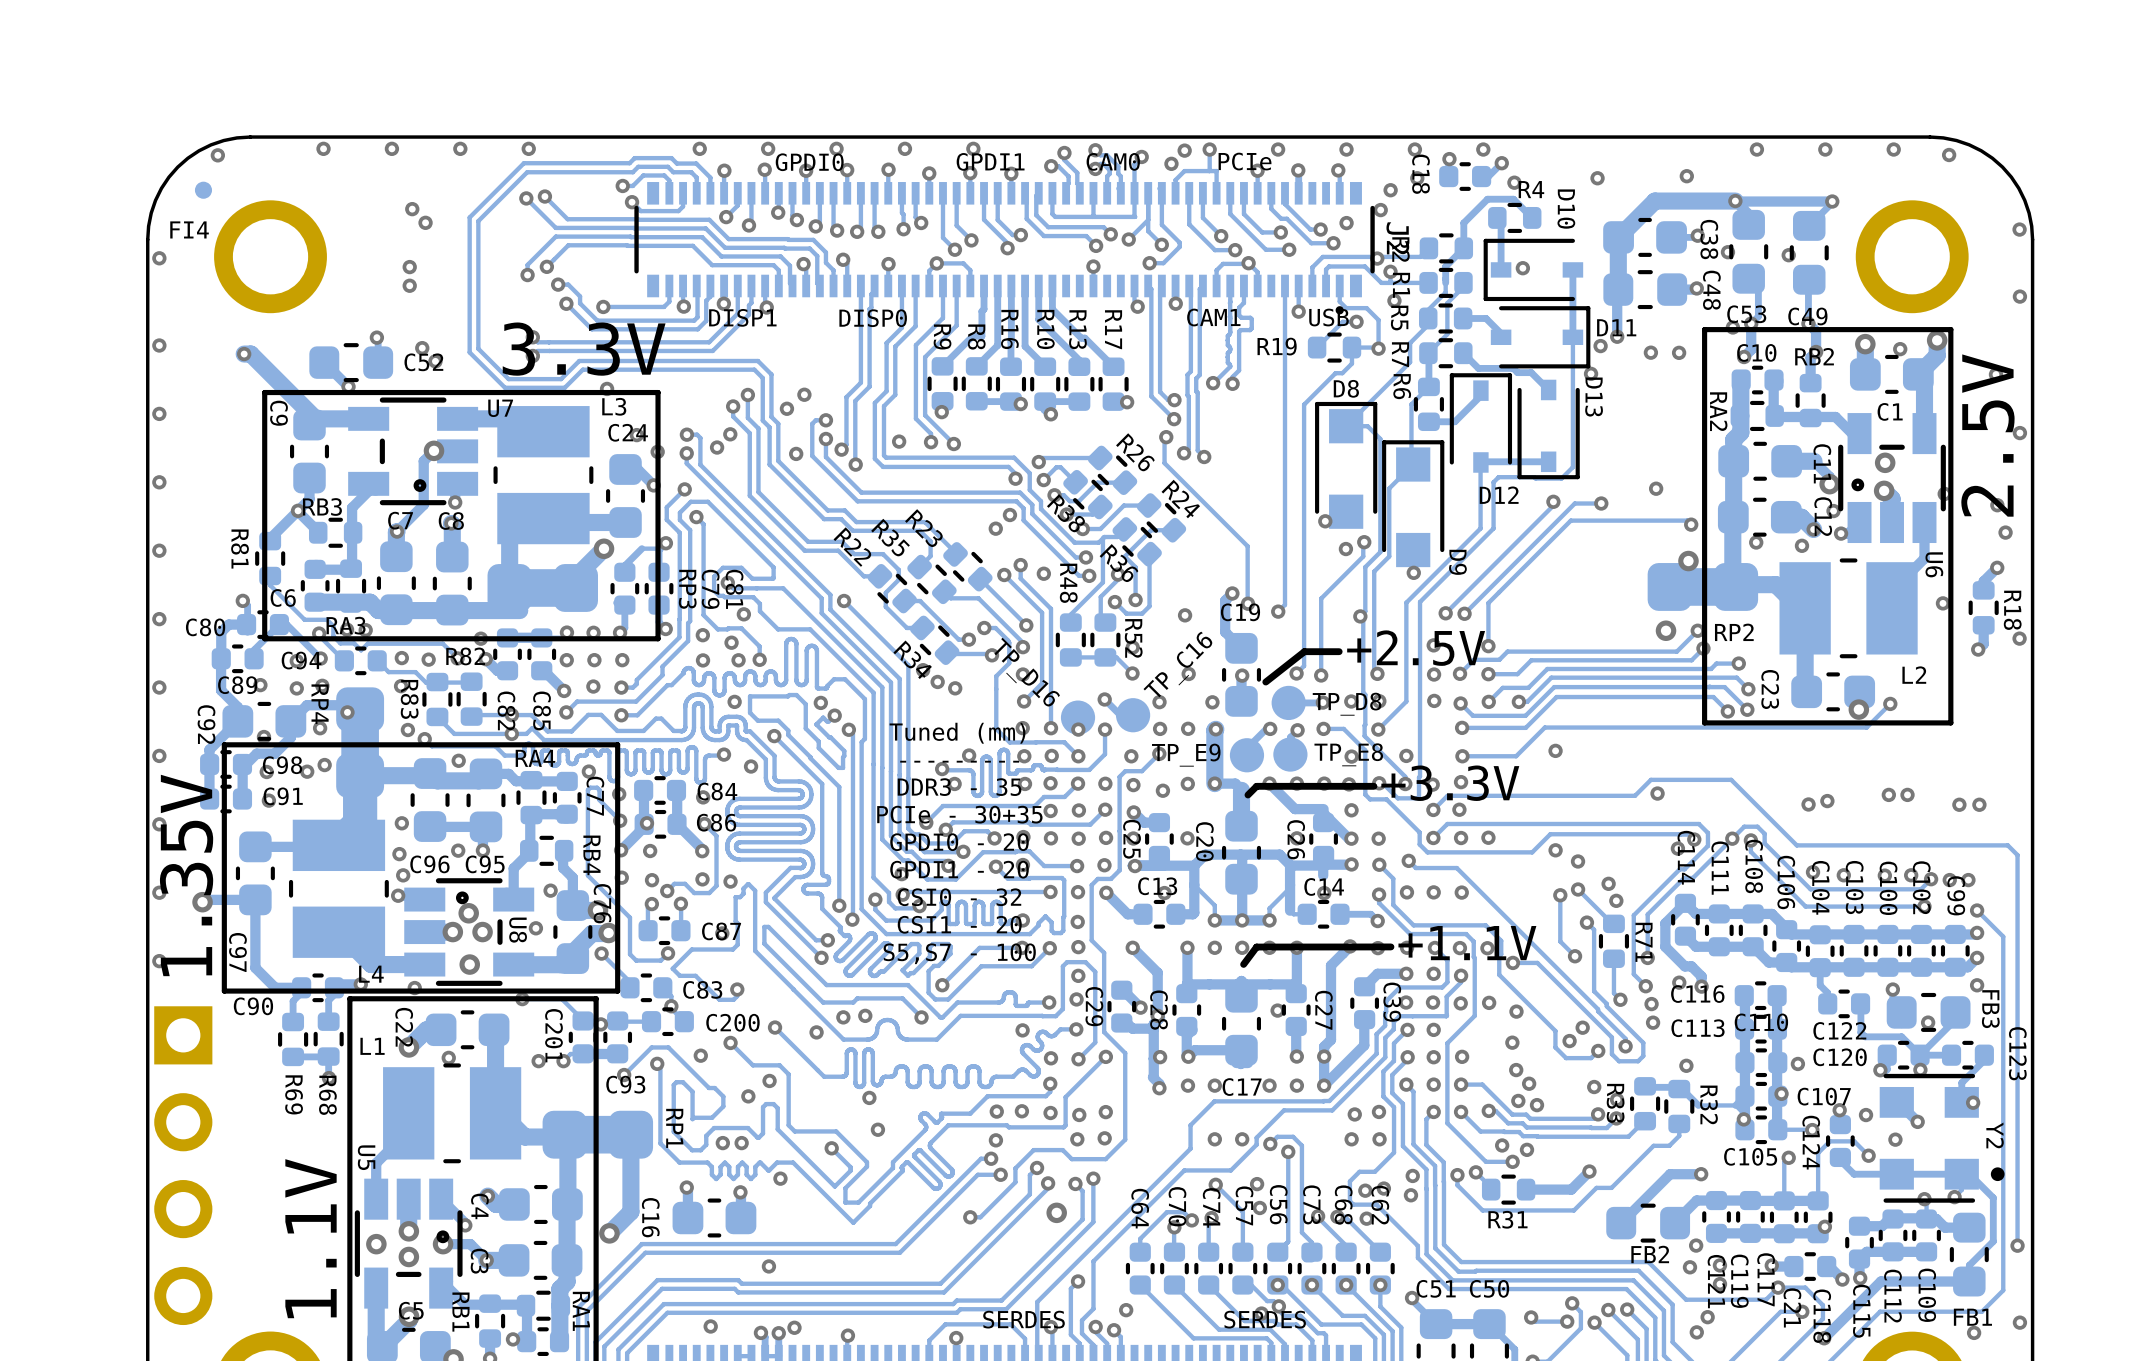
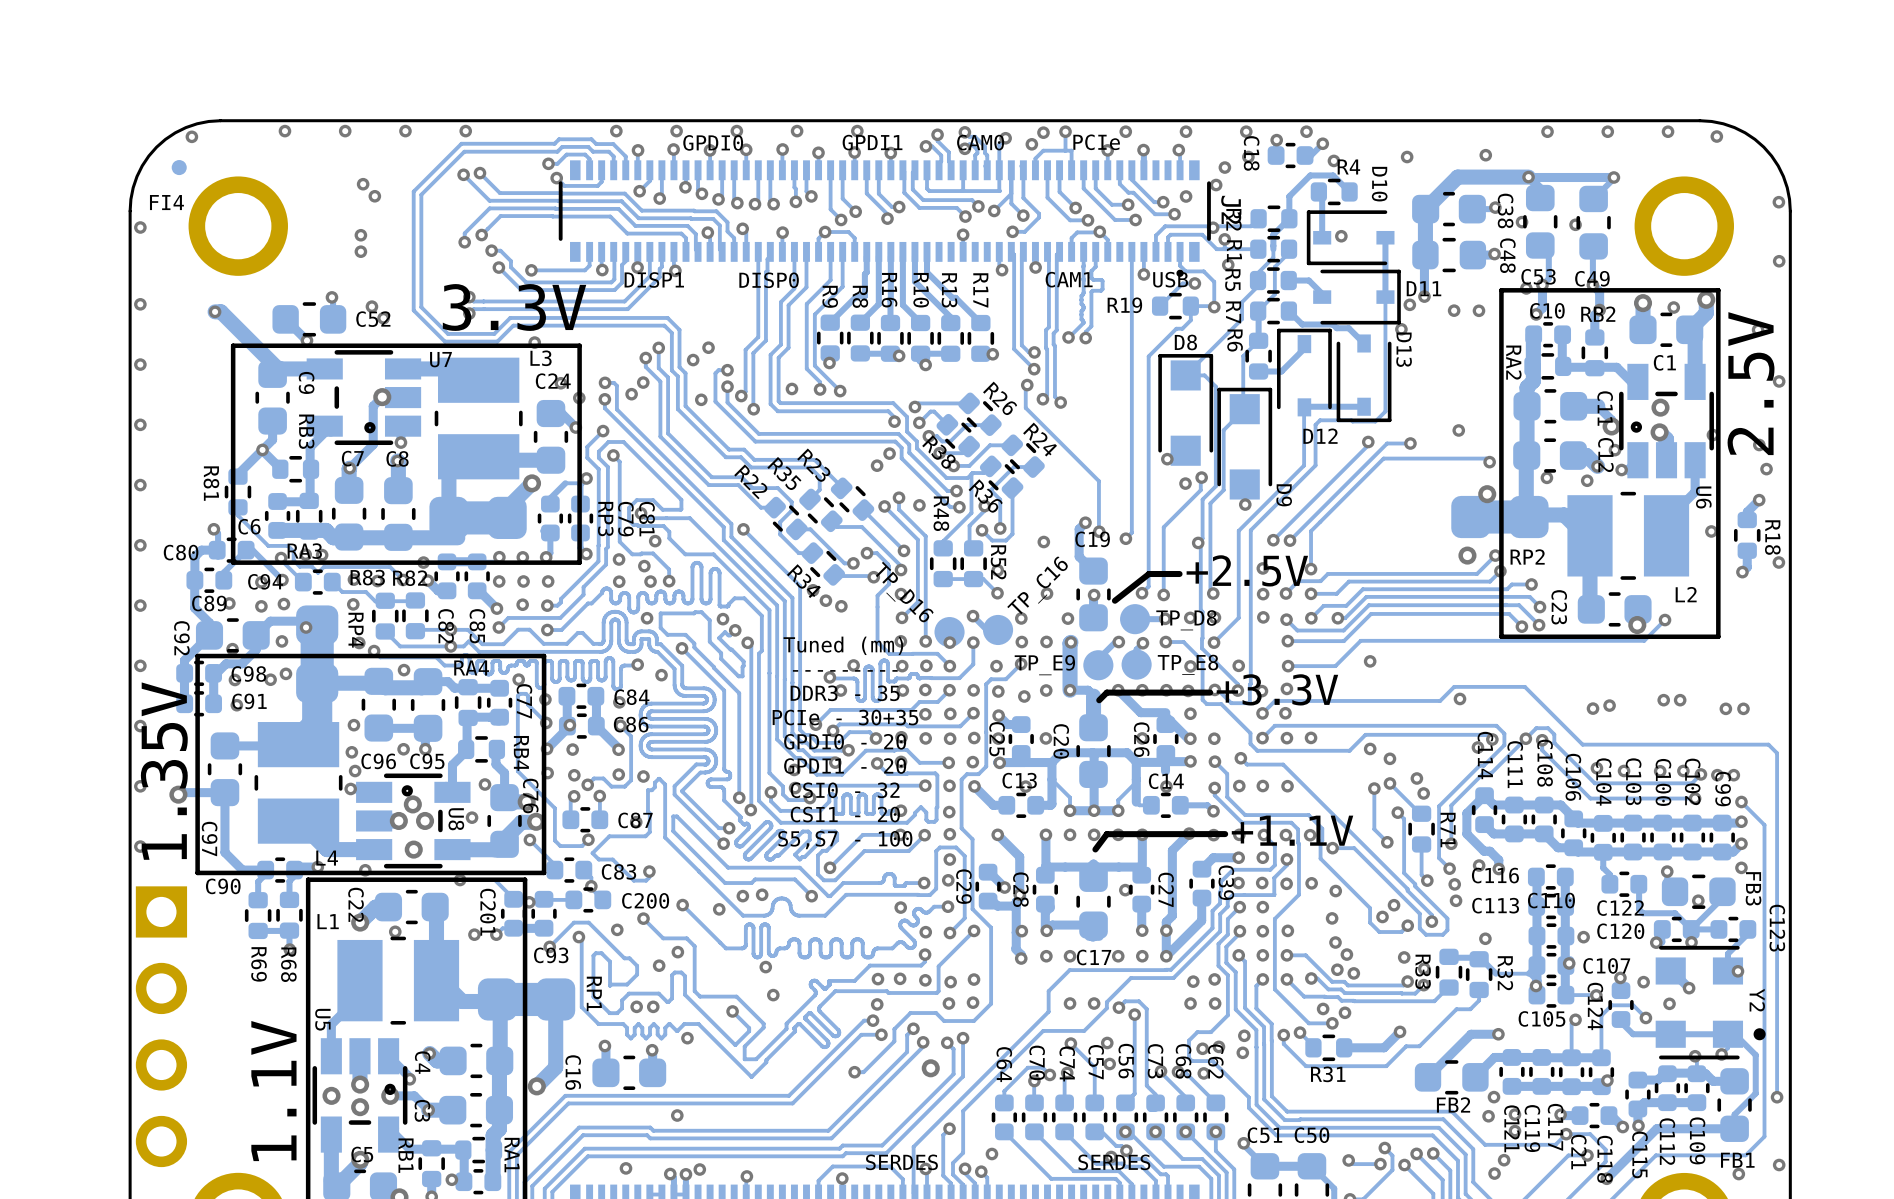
C9 name position: C9 (279, 413) -> C9 (306, 382)
RB3 name rotation: 0° (322, 506) -> 90° clockwise (306, 431)
R83 name rotation: 0° (409, 699) -> 90° counterclockwise (367, 577)
RP4 name position: RP4 (320, 704) -> RP4 (356, 630)

